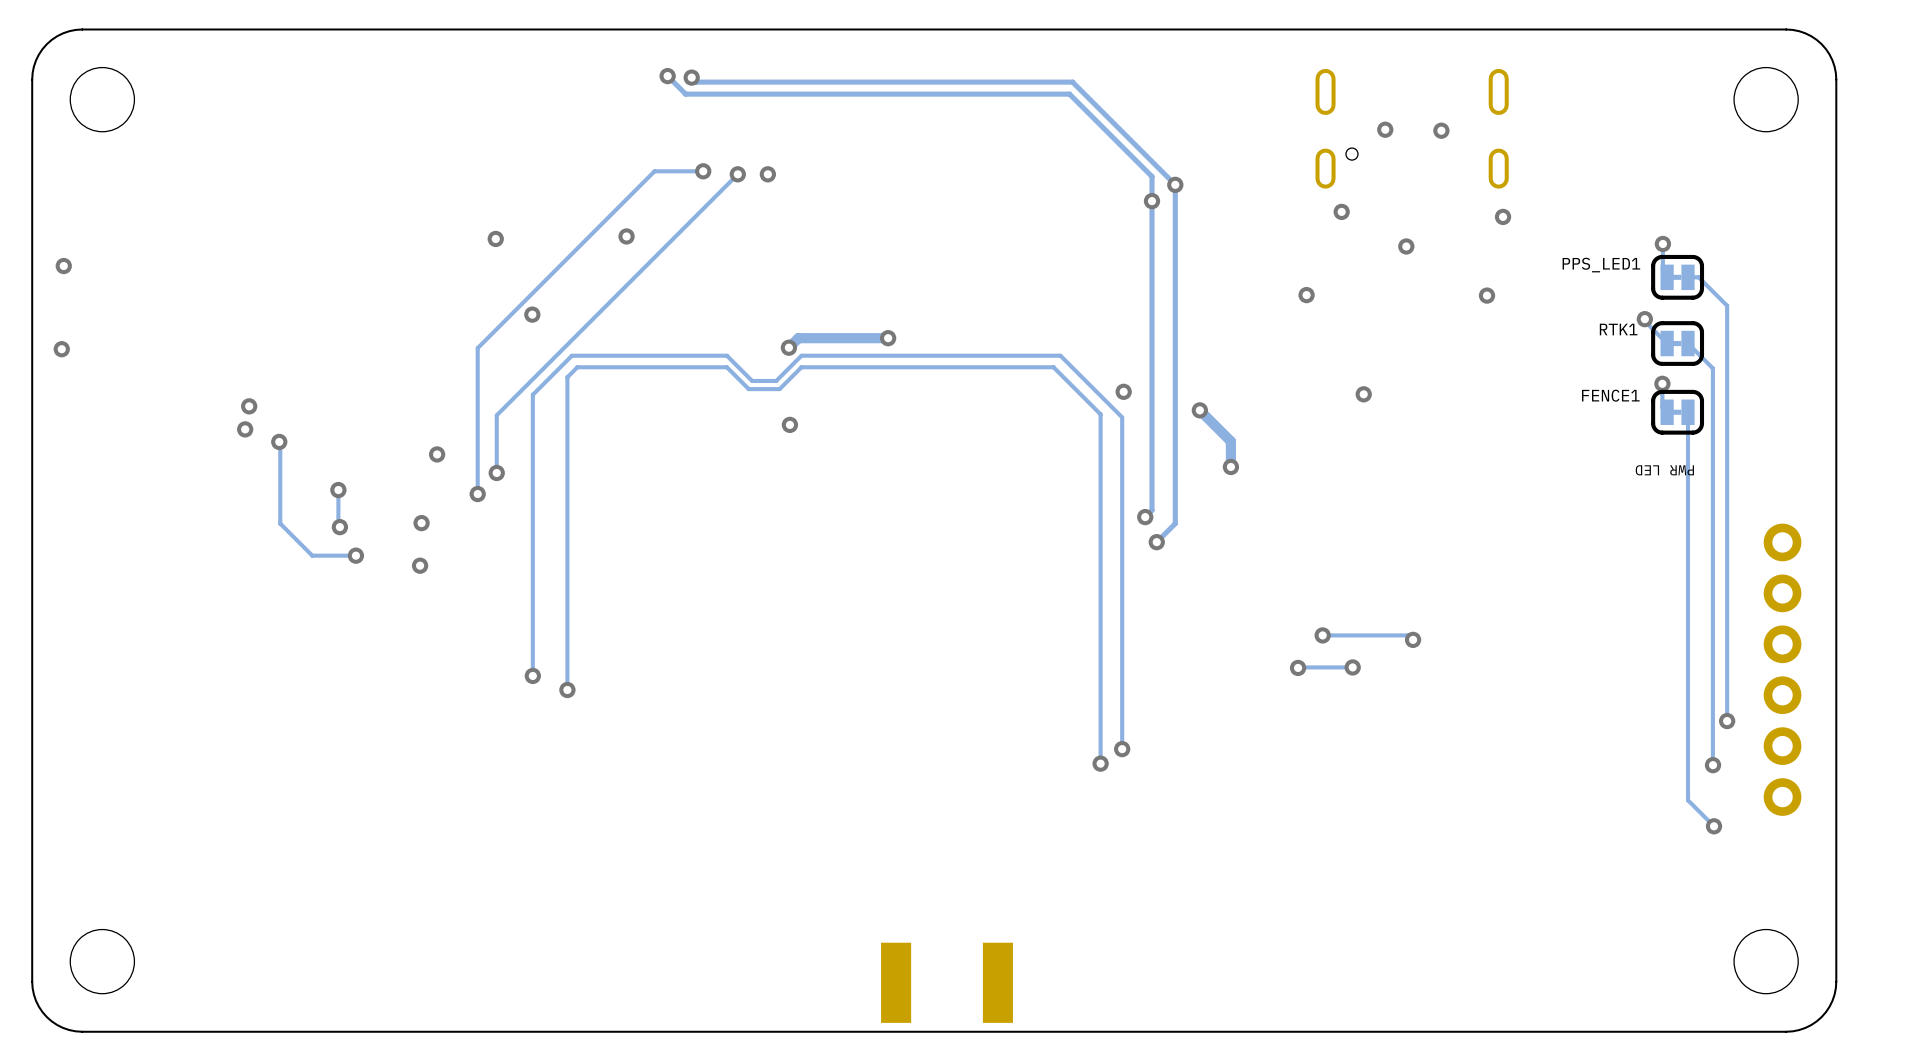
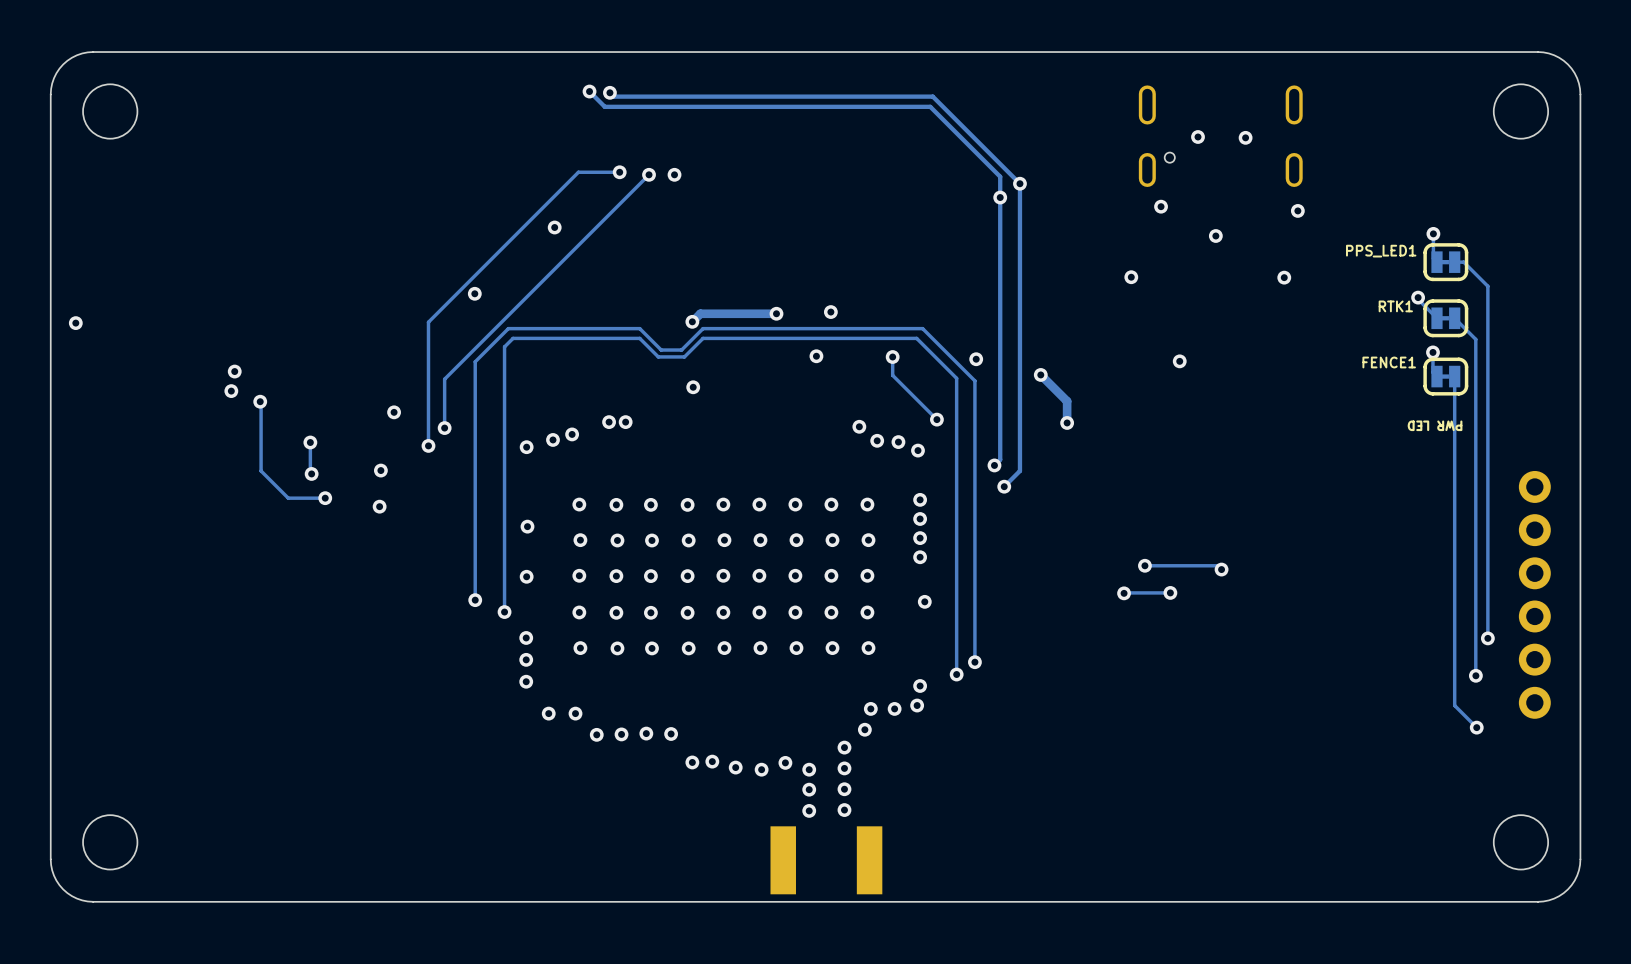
via: (495, 238) -> none
via: (63, 266) -> none
via: none -> (830, 312)
via: none -> (816, 356)
track: none -> (892, 357) (892, 375) (936, 419)
via: none -> (892, 357)
via: none -> (936, 419)
via: none -> (609, 422)
via: none -> (625, 422)
via: none -> (859, 426)
via: none -> (572, 434)
via: none -> (552, 439)
via: none -> (877, 440)
via: none -> (898, 442)
via: none -> (526, 447)
via: none -> (917, 450)
via: none -> (920, 499)
via: none -> (579, 504)
via: none -> (616, 504)
via: none -> (650, 504)
via: none -> (687, 504)
via: none -> (723, 504)
via: none -> (759, 504)
via: none -> (795, 504)
via: none -> (831, 504)
via: none -> (867, 504)
via: none -> (920, 518)
via: none -> (527, 526)
via: none -> (920, 538)
via: none -> (580, 540)
via: none -> (617, 540)
via: none -> (651, 540)
via: none -> (688, 540)
via: none -> (724, 540)
via: none -> (760, 540)
via: none -> (796, 540)
via: none -> (832, 540)
via: none -> (868, 540)
via: none -> (920, 557)
via: none -> (579, 575)
via: none -> (616, 576)
via: none -> (650, 576)
via: none -> (687, 576)
via: none -> (723, 575)
via: none -> (759, 575)
via: none -> (795, 575)
via: none -> (831, 575)
via: none -> (867, 575)
via: none -> (526, 576)
via: none -> (924, 601)
via: none -> (579, 612)
via: none -> (616, 612)
via: none -> (650, 612)
via: none -> (687, 612)
via: none -> (723, 612)
via: none -> (759, 612)
via: none -> (795, 612)
via: none -> (831, 612)
via: none -> (867, 612)
via: none -> (526, 637)
via: none -> (580, 648)
via: none -> (617, 648)
via: none -> (651, 648)
via: none -> (688, 648)
via: none -> (724, 648)
via: none -> (760, 648)
via: none -> (796, 648)
via: none -> (832, 648)
via: none -> (868, 648)
via: none -> (526, 659)
via: none -> (526, 681)
via: none -> (920, 685)
via: none -> (917, 705)
via: none -> (870, 708)
via: none -> (894, 708)
via: none -> (548, 713)
via: none -> (575, 713)
via: none -> (864, 729)
via: none -> (646, 733)
via: none -> (671, 733)
via: none -> (596, 734)
via: none -> (621, 734)
via: none -> (844, 747)
via: none -> (712, 761)
via: none -> (692, 762)
via: none -> (785, 762)
via: none -> (735, 767)
via: none -> (844, 768)
via: none -> (761, 769)
via: none -> (809, 769)
via: none -> (844, 789)
via: none -> (809, 789)
via: none -> (844, 810)
via: none -> (809, 810)

